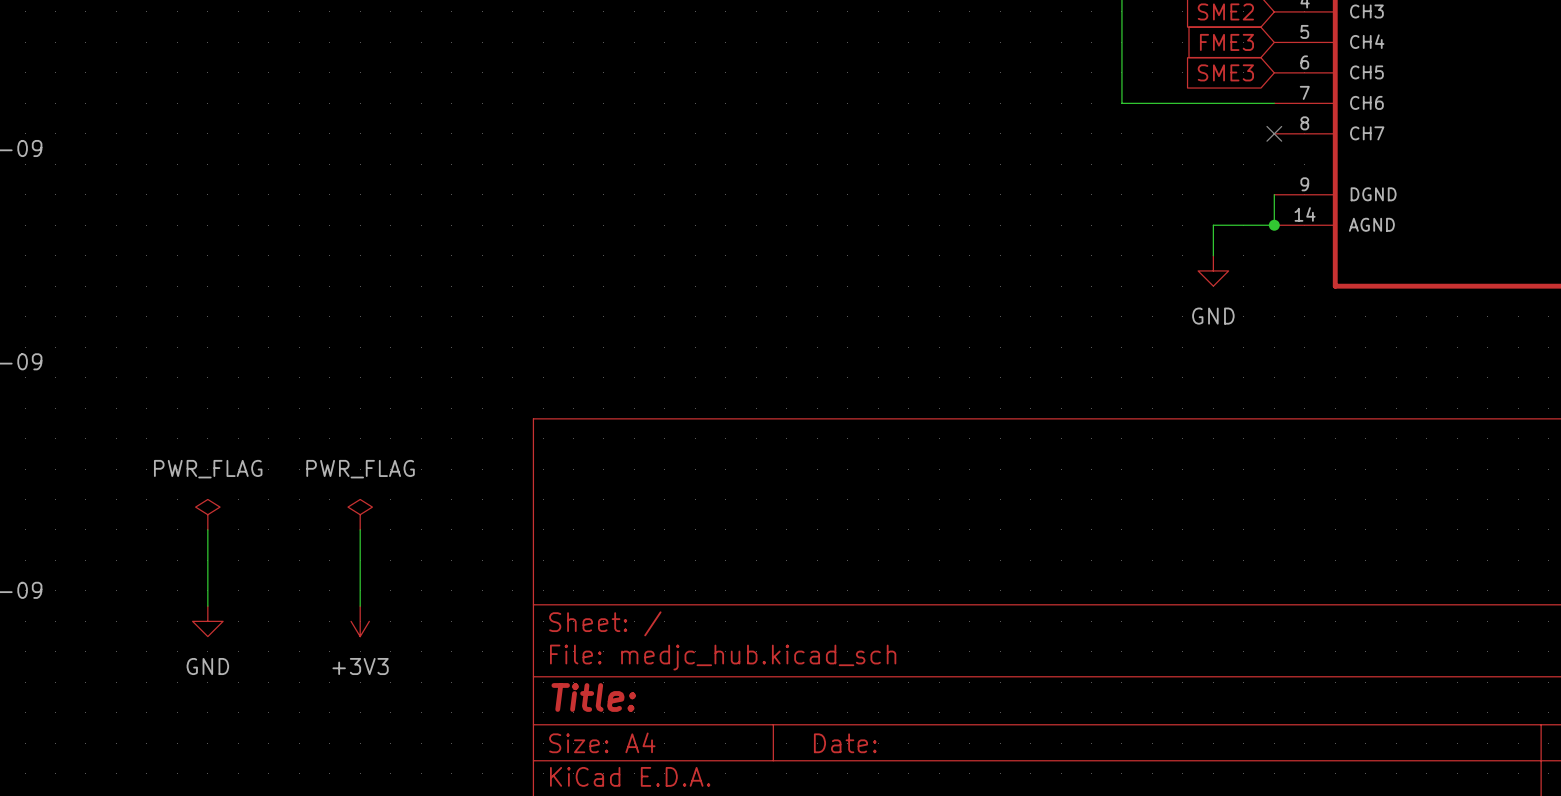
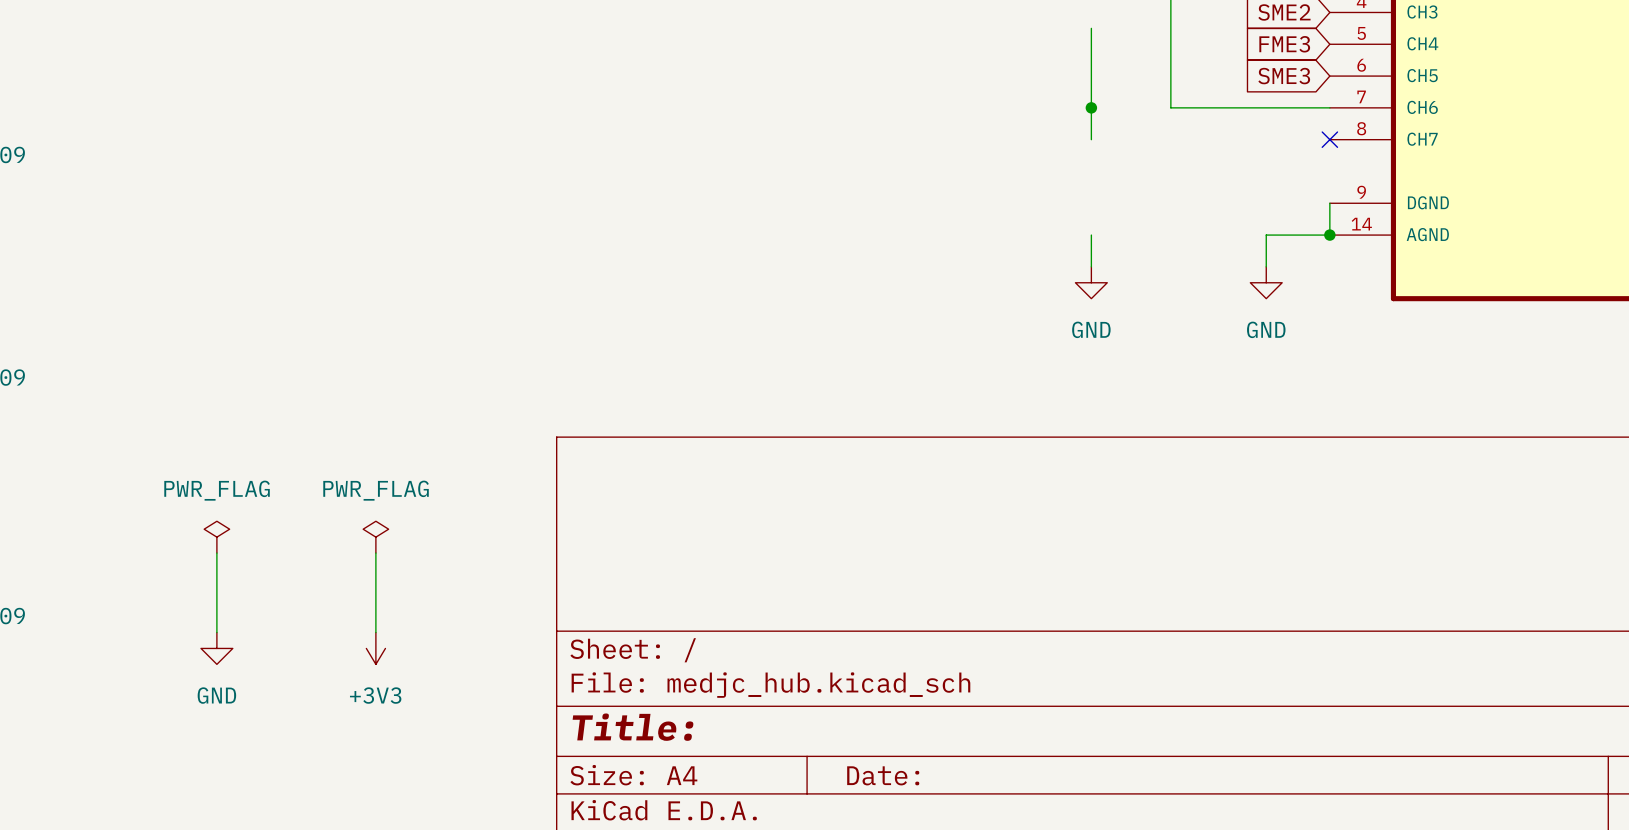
wire: none -> (1091, 28) (1091, 139)
junction: none -> (1091, 107)
wire: none -> (1091, 235) (1091, 266)
power symbol: none -> GND (1091, 282)

